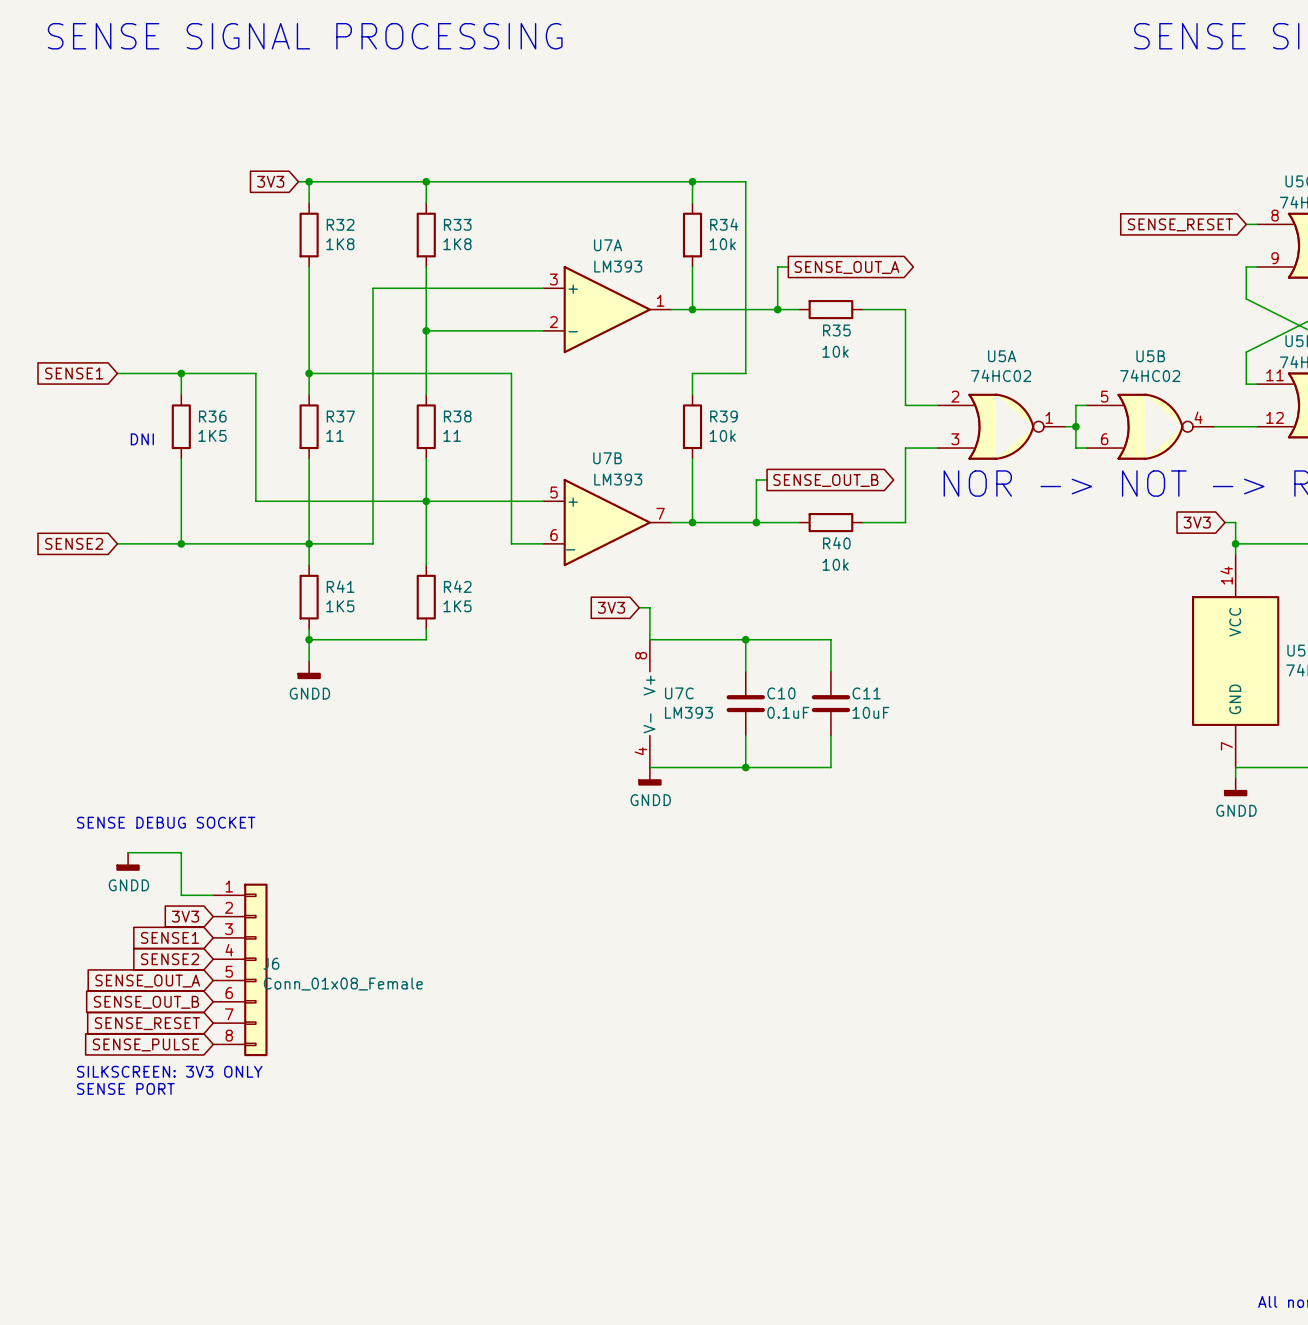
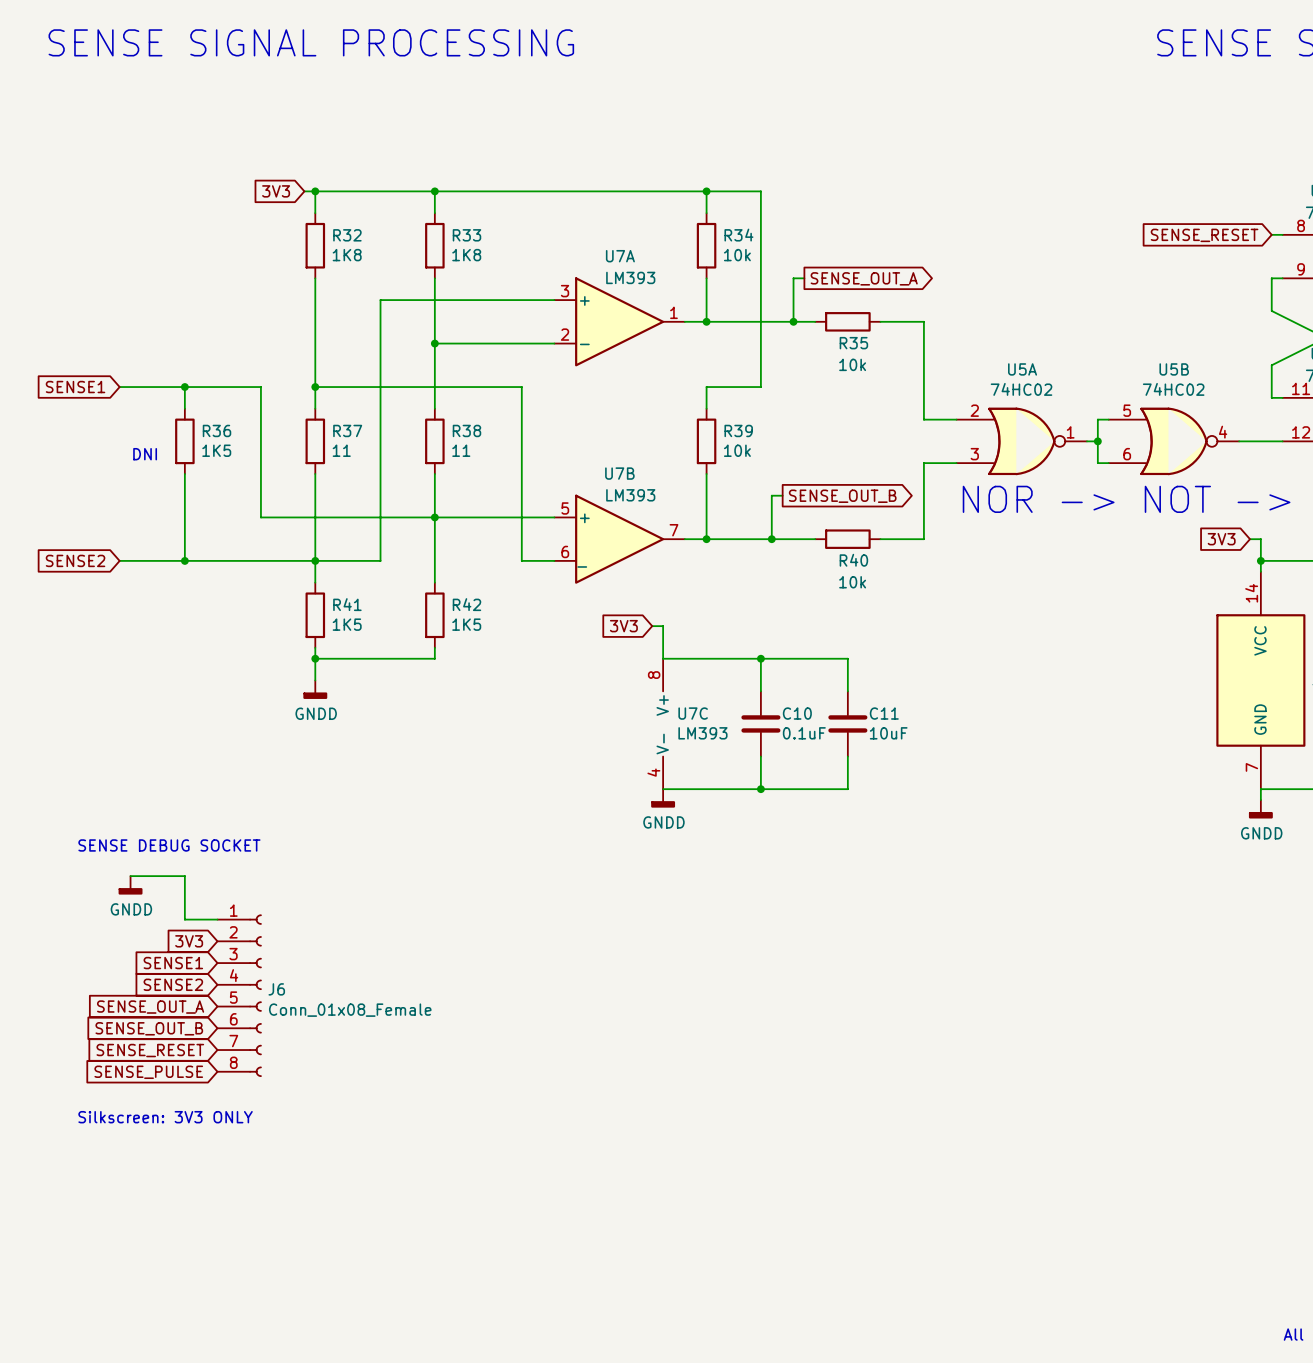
J6 symbol: [213, 883, 268, 1057] -> [217, 914, 262, 1077]
text: SILKSCREEN: 3V3 ONLY (169, 1071) -> none
text: SENSE PORT (125, 1088) -> Silkscreen: 3V3 ONLY (165, 1117)

